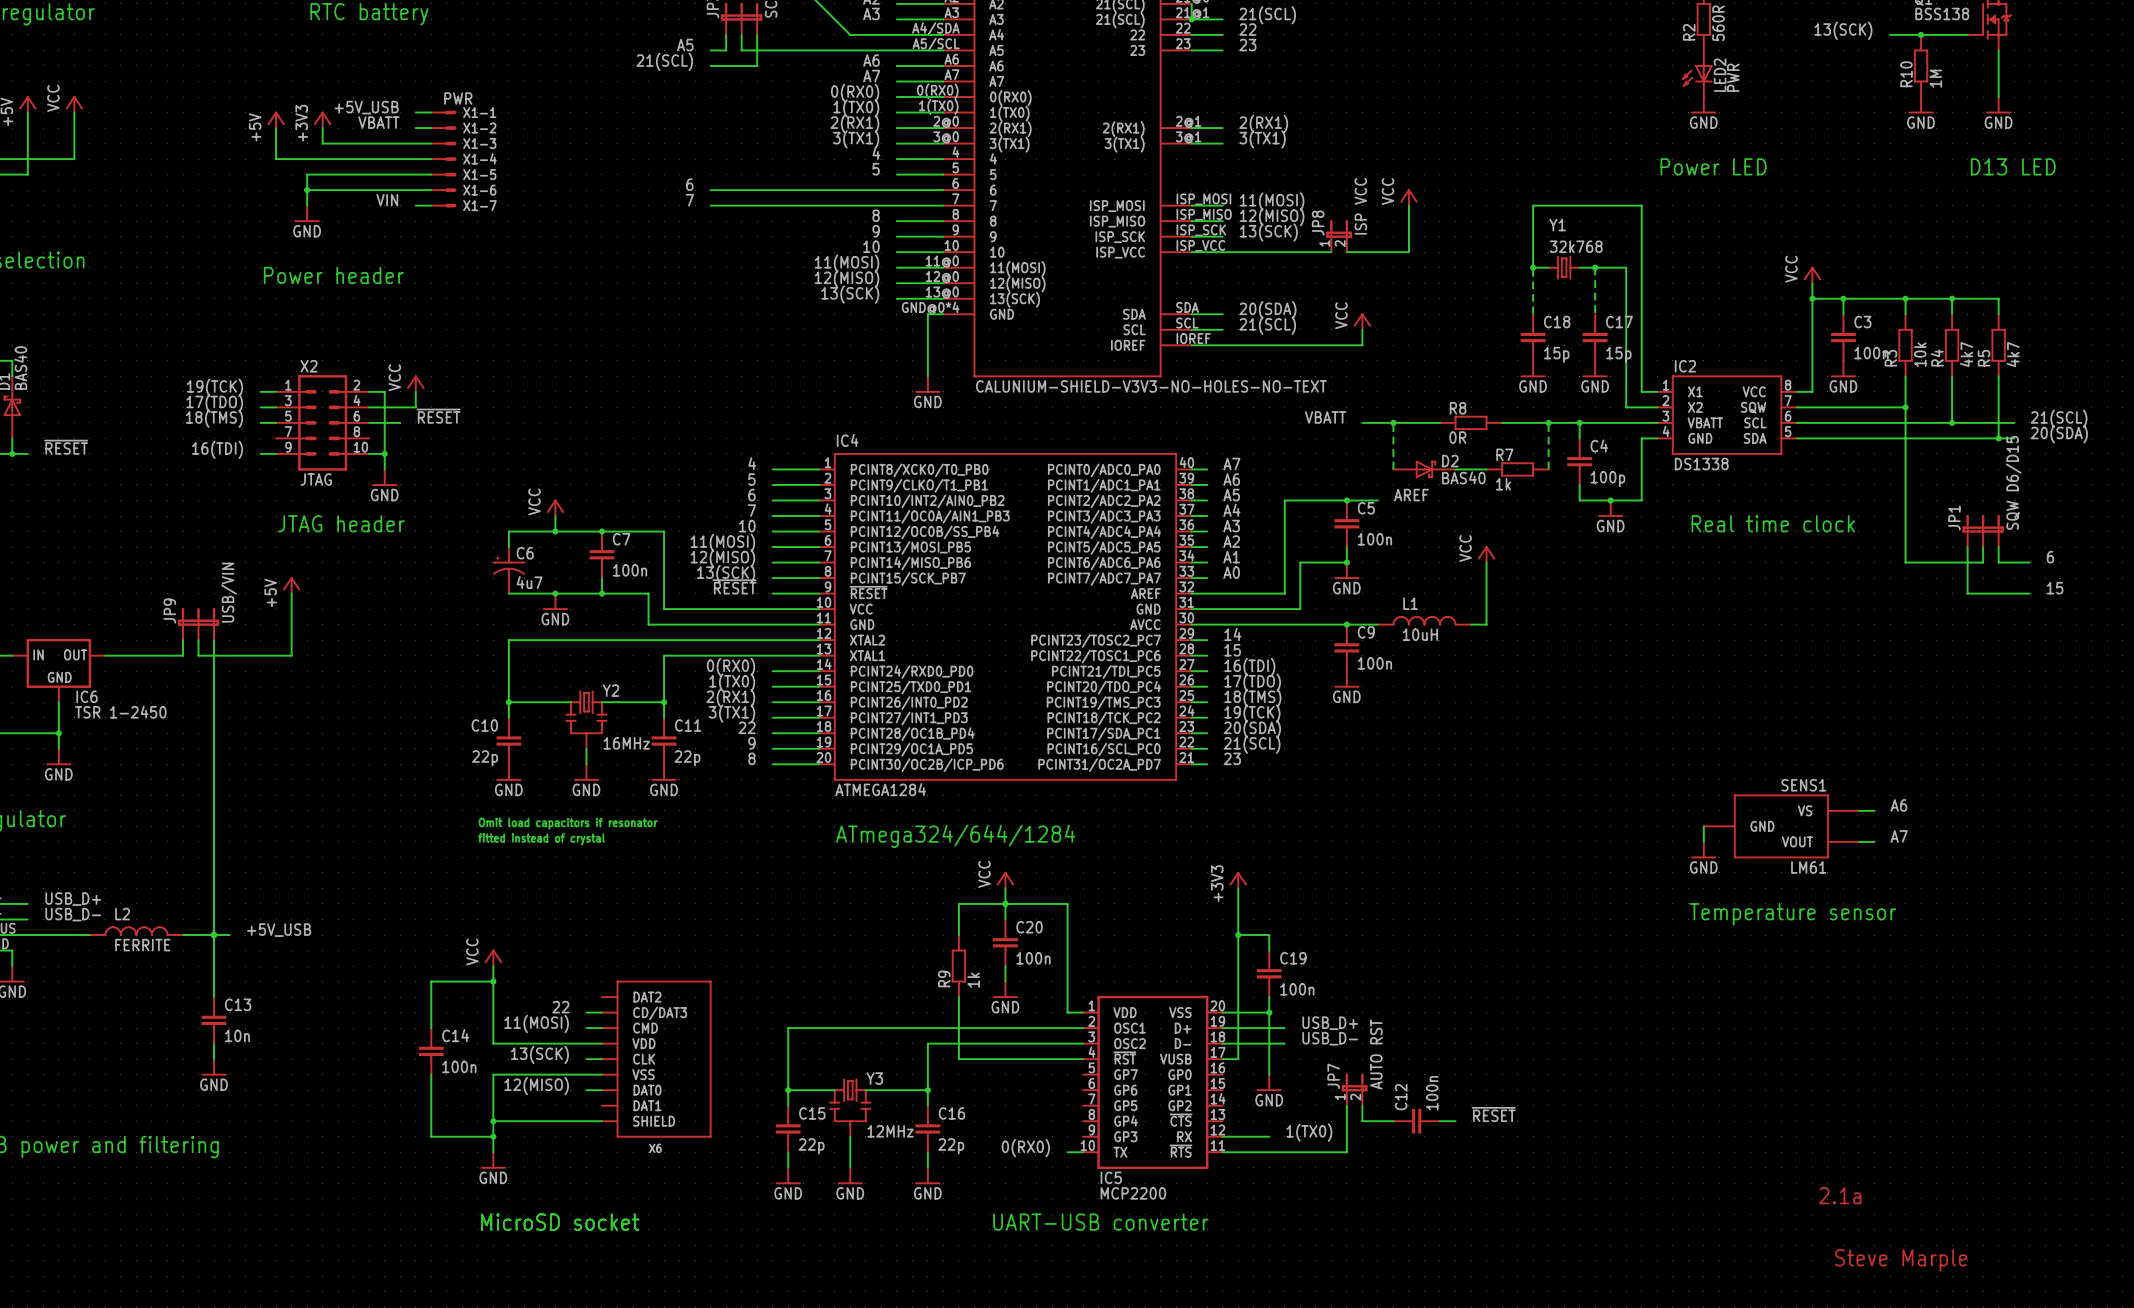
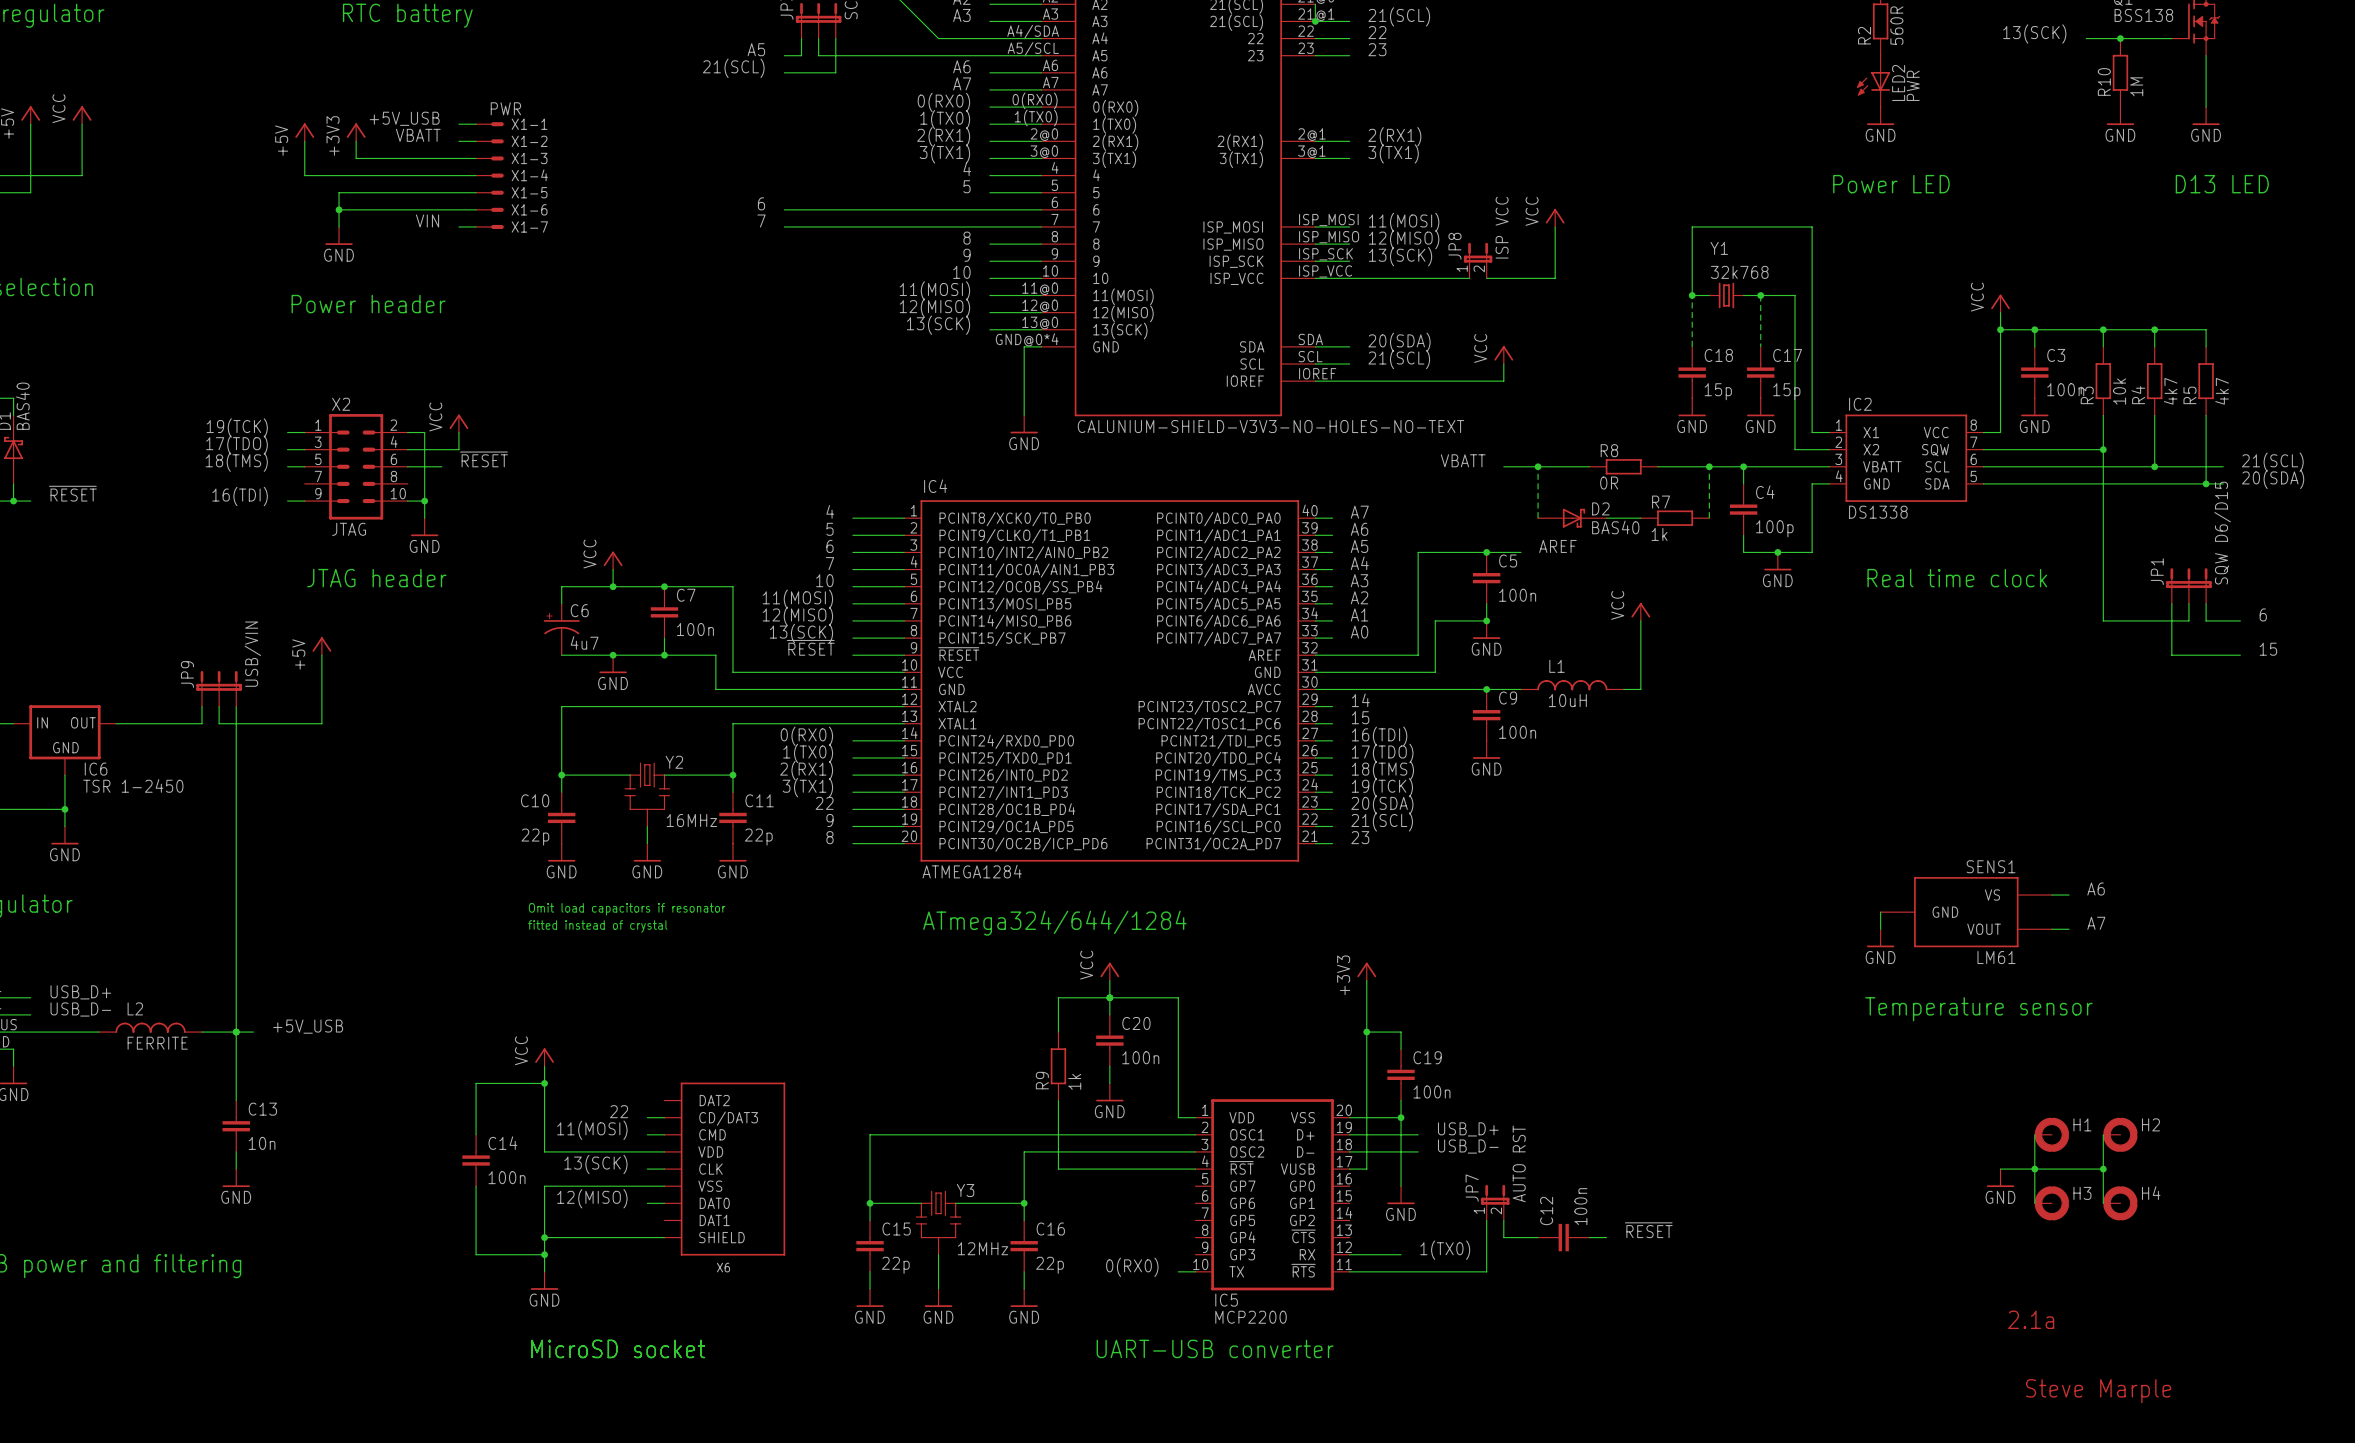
wire: none -> (2034, 1134) (2034, 1203)
H1: none -> (2051, 1134)
wire: none -> (2103, 1134) (2103, 1203)
H2: none -> (2120, 1134)
wire: none -> (2000, 1169) (2103, 1169)
junction: none -> (2034, 1169)
junction: none -> (2103, 1169)
power symbol: none -> GND (2000, 1178)
H3: none -> (2051, 1203)
H4: none -> (2120, 1203)

